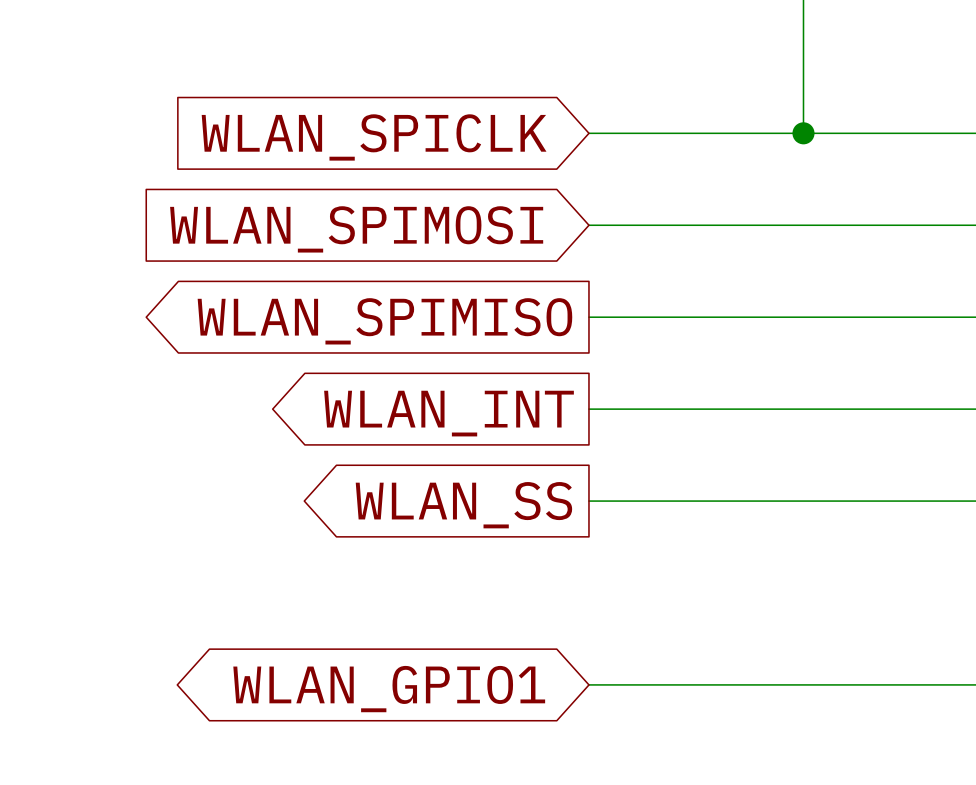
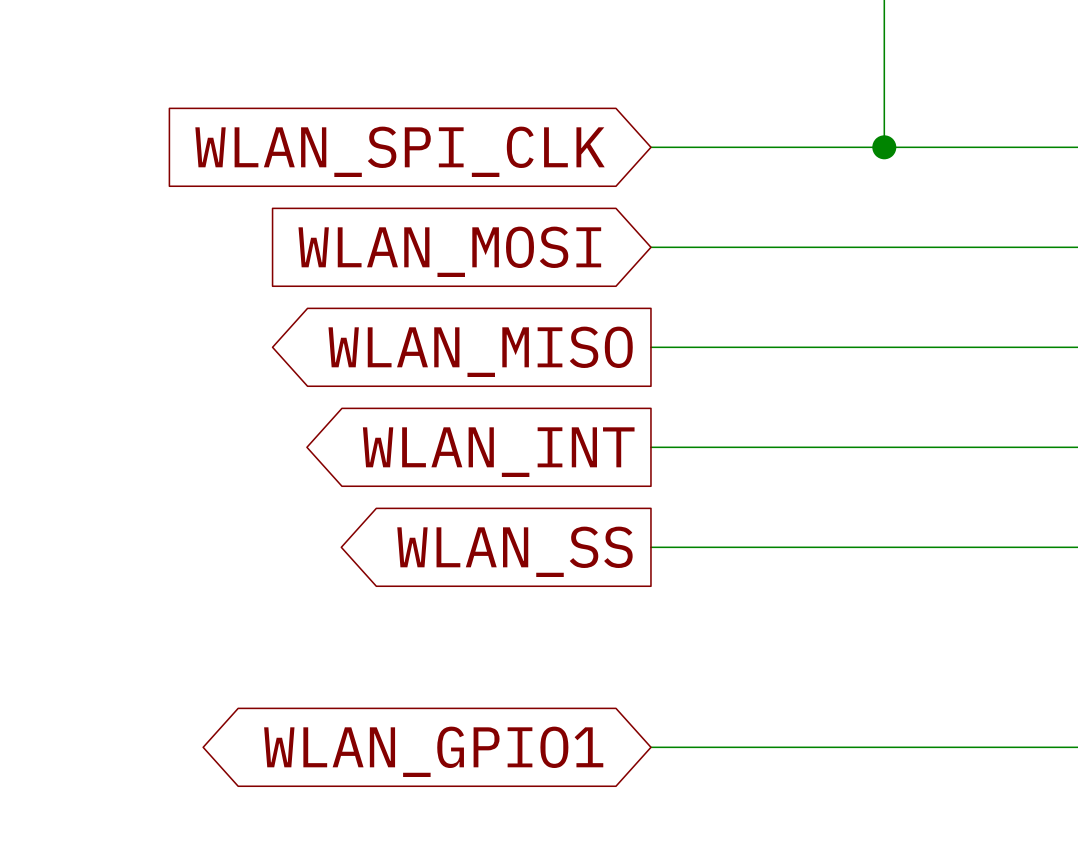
global label: WLAN_SPICLK (374, 137) -> WLAN_SPI_CLK (400, 151)
global label: WLAN_SPIMOSI (356, 229) -> WLAN_MOSI (449, 251)
global label: WLAN_SPIMISO (384, 321) -> WLAN_MISO (480, 351)

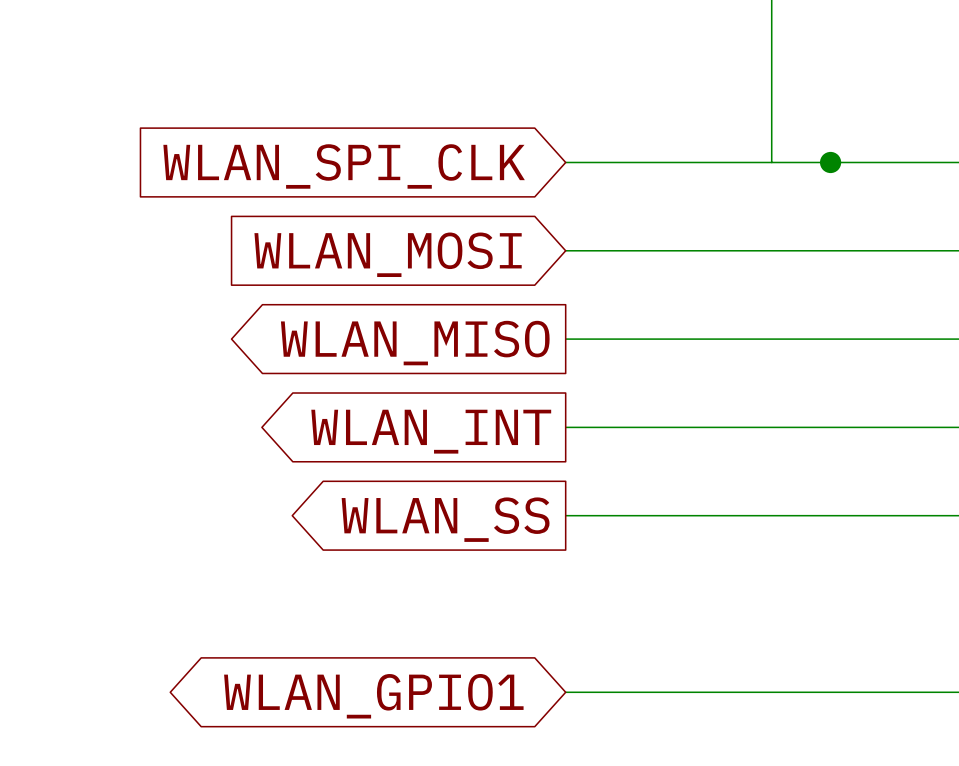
junction position: (884, 147) -> (830, 162)

